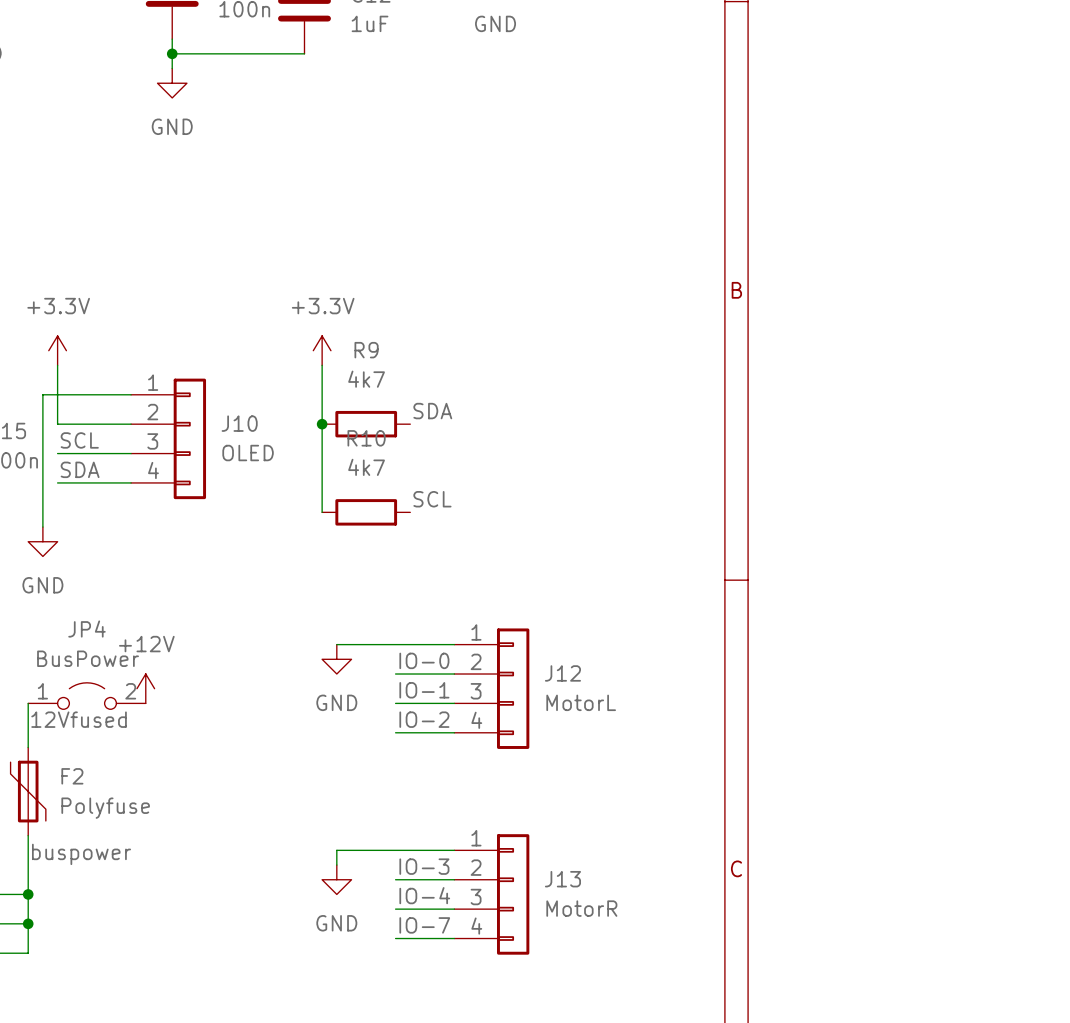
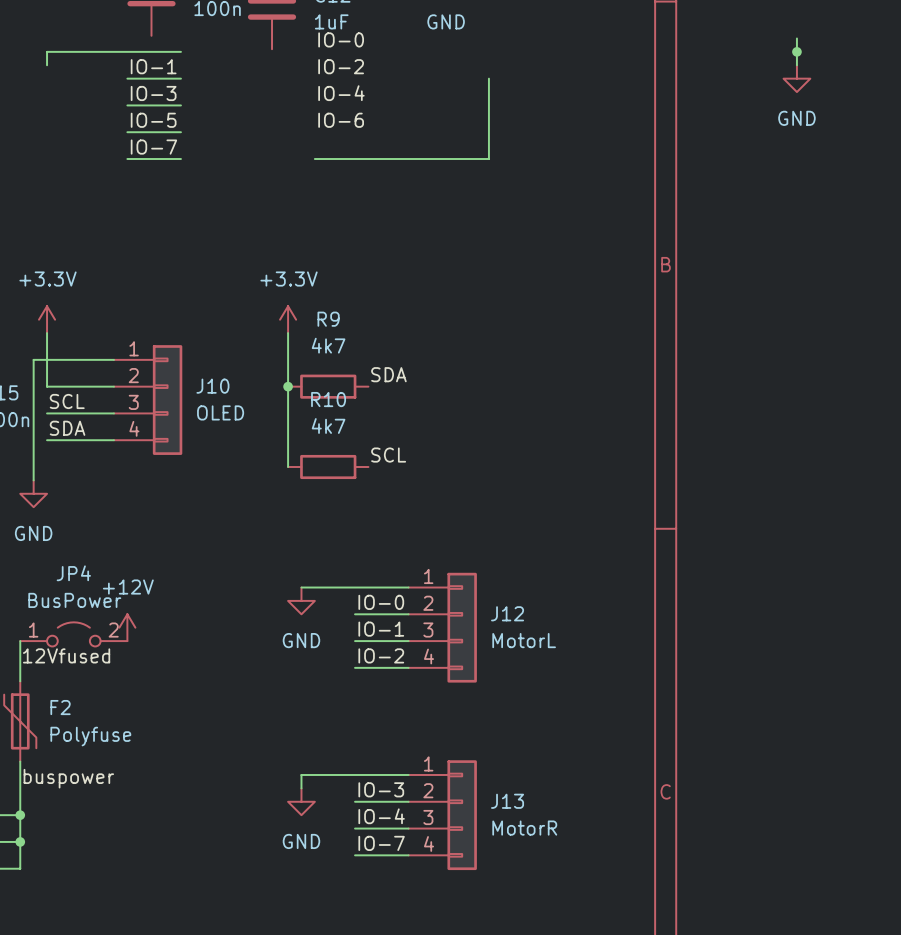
wire: (172, 39) (172, 68) -> none
wire: none -> (796, 38) (796, 65)
label: none -> IO-0 (341, 39)
wire: (172, 53) (304, 53) -> none
junction: (172, 53) -> none
wire: none -> (180, 51) (47, 51) (47, 65)
junction: none -> (796, 51)
label: none -> IO-1 (153, 66)
label: none -> IO-2 (341, 66)
power symbol: GND (172, 83) -> none
wire: none -> (127, 78) (180, 78)
wire: none -> (488, 78) (488, 159) (314, 159)
power symbol: none -> GND (796, 78)
label: none -> IO-3 (153, 93)
label: none -> IO-4 (341, 93)
wire: none -> (127, 105) (180, 105)
label: none -> IO-5 (153, 120)
label: none -> IO-6 (341, 120)
wire: none -> (127, 132) (180, 132)
label: none -> IO-7 (153, 147)
wire: none -> (127, 159) (180, 159)

